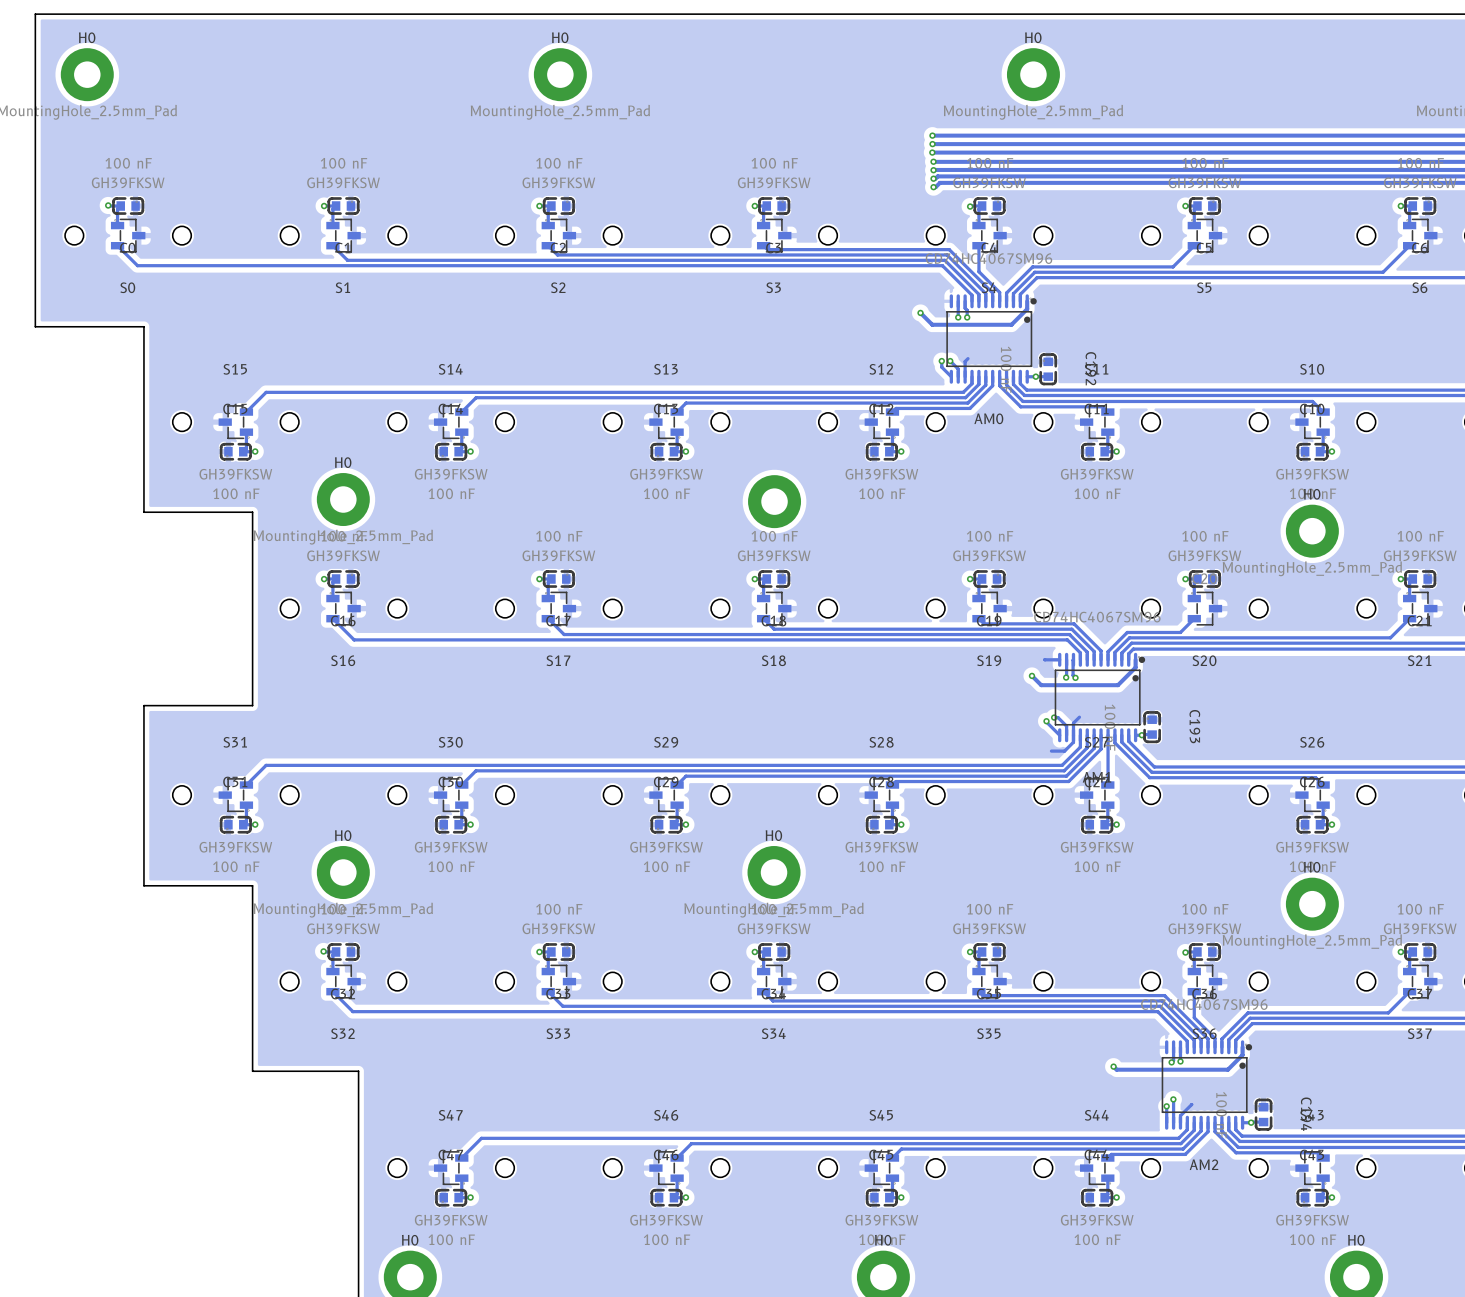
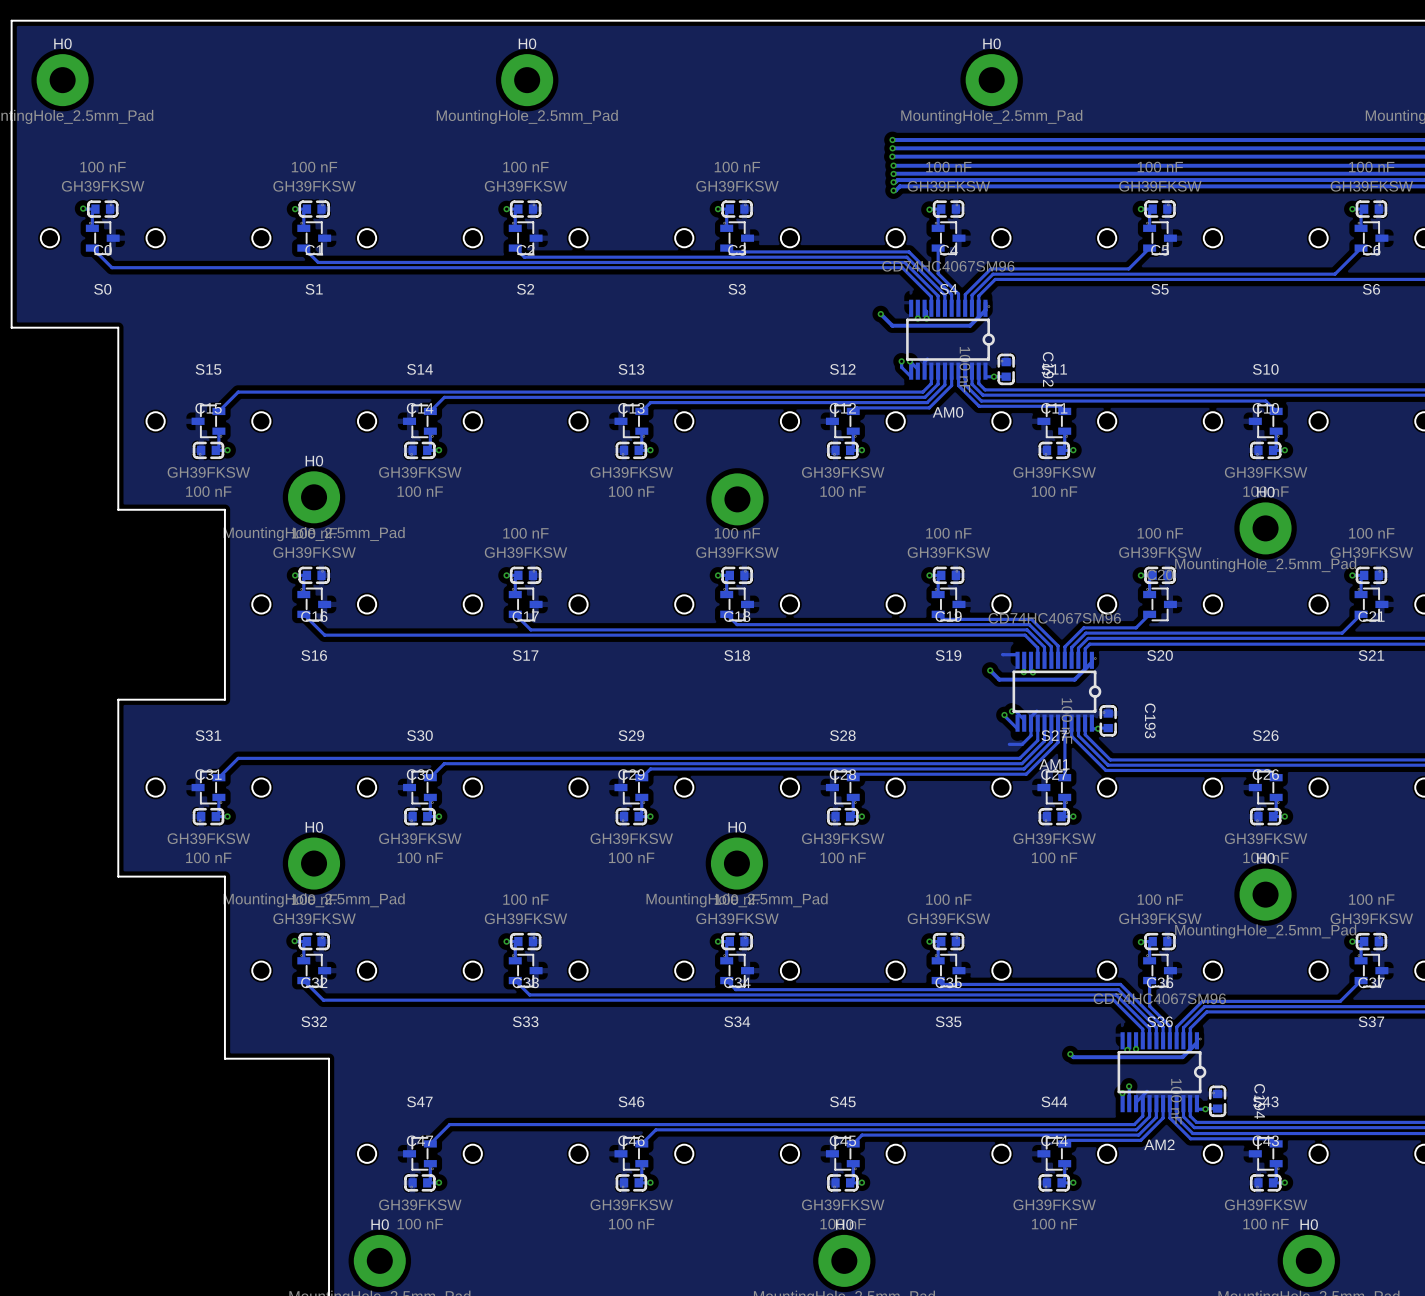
AM0 footprint: [946, 294, 1037, 384] -> [906, 299, 995, 380]
AM1 footprint: [1054, 652, 1146, 743] -> [1012, 651, 1102, 732]
AM2 footprint: [1161, 1040, 1253, 1130] -> [1117, 1032, 1207, 1113]

